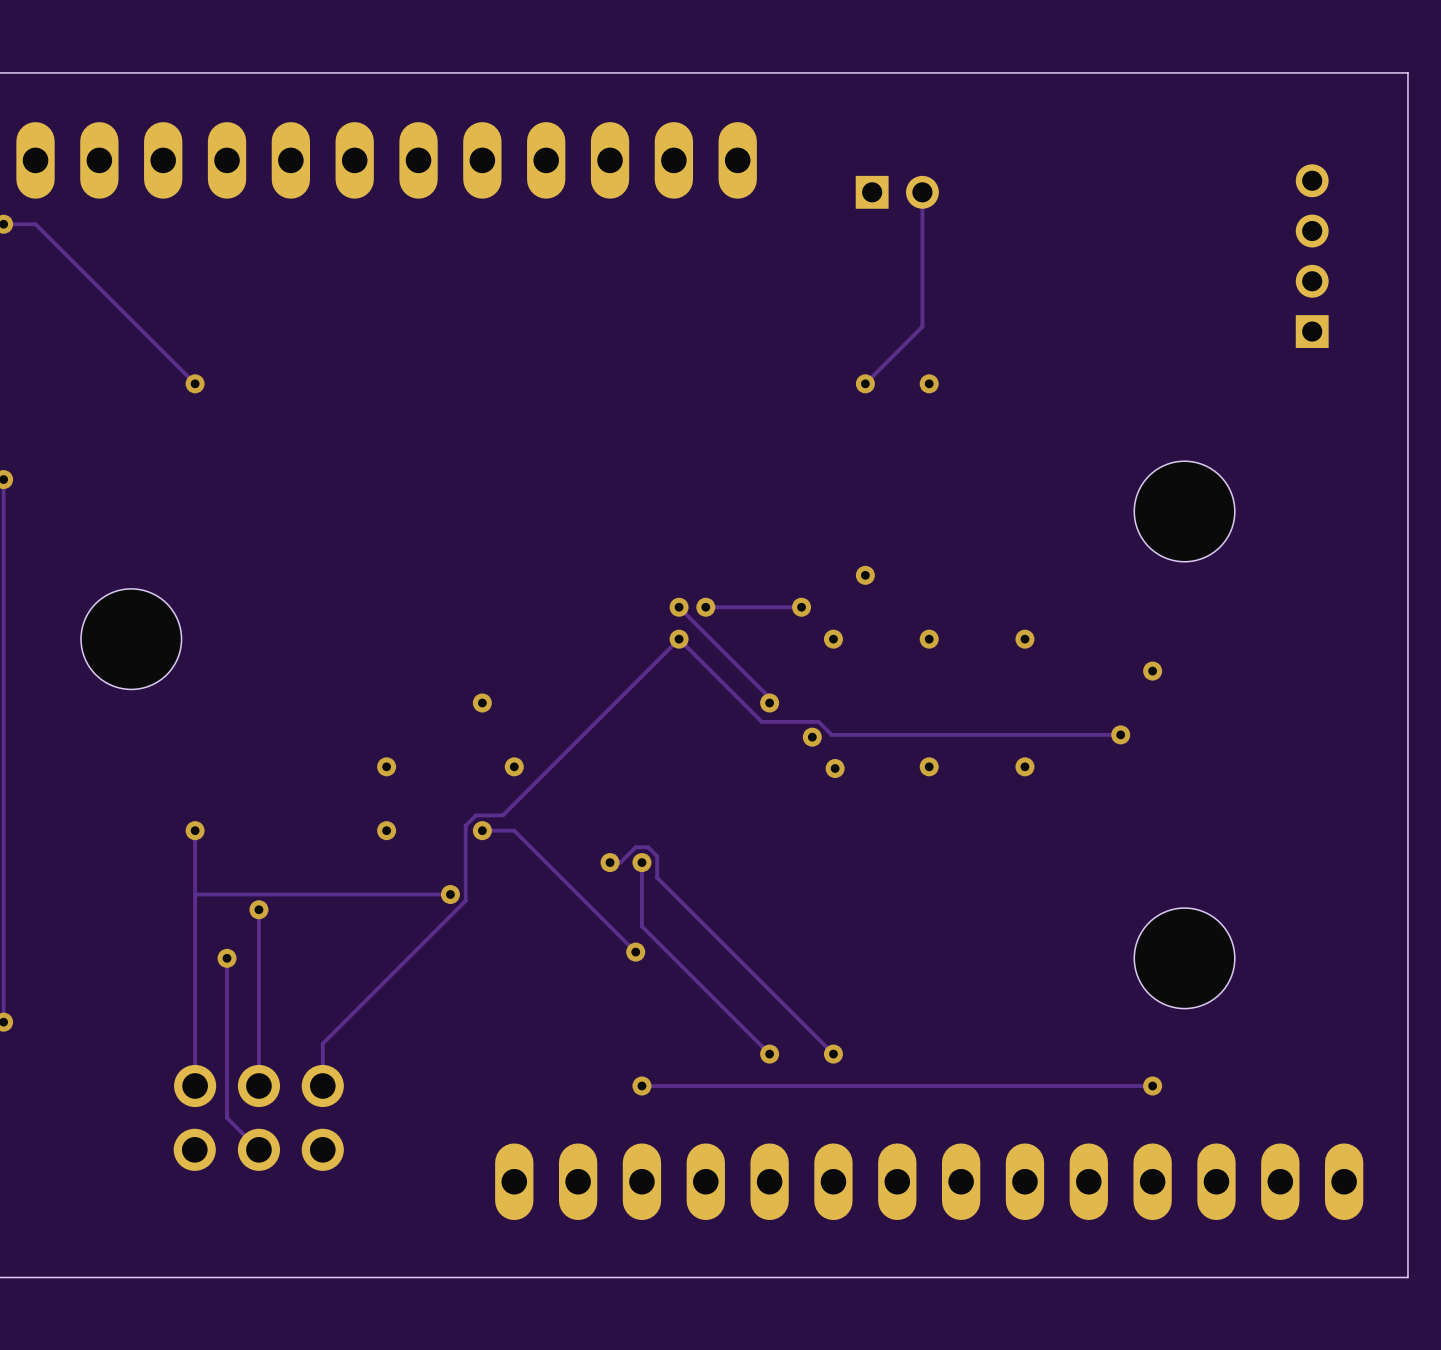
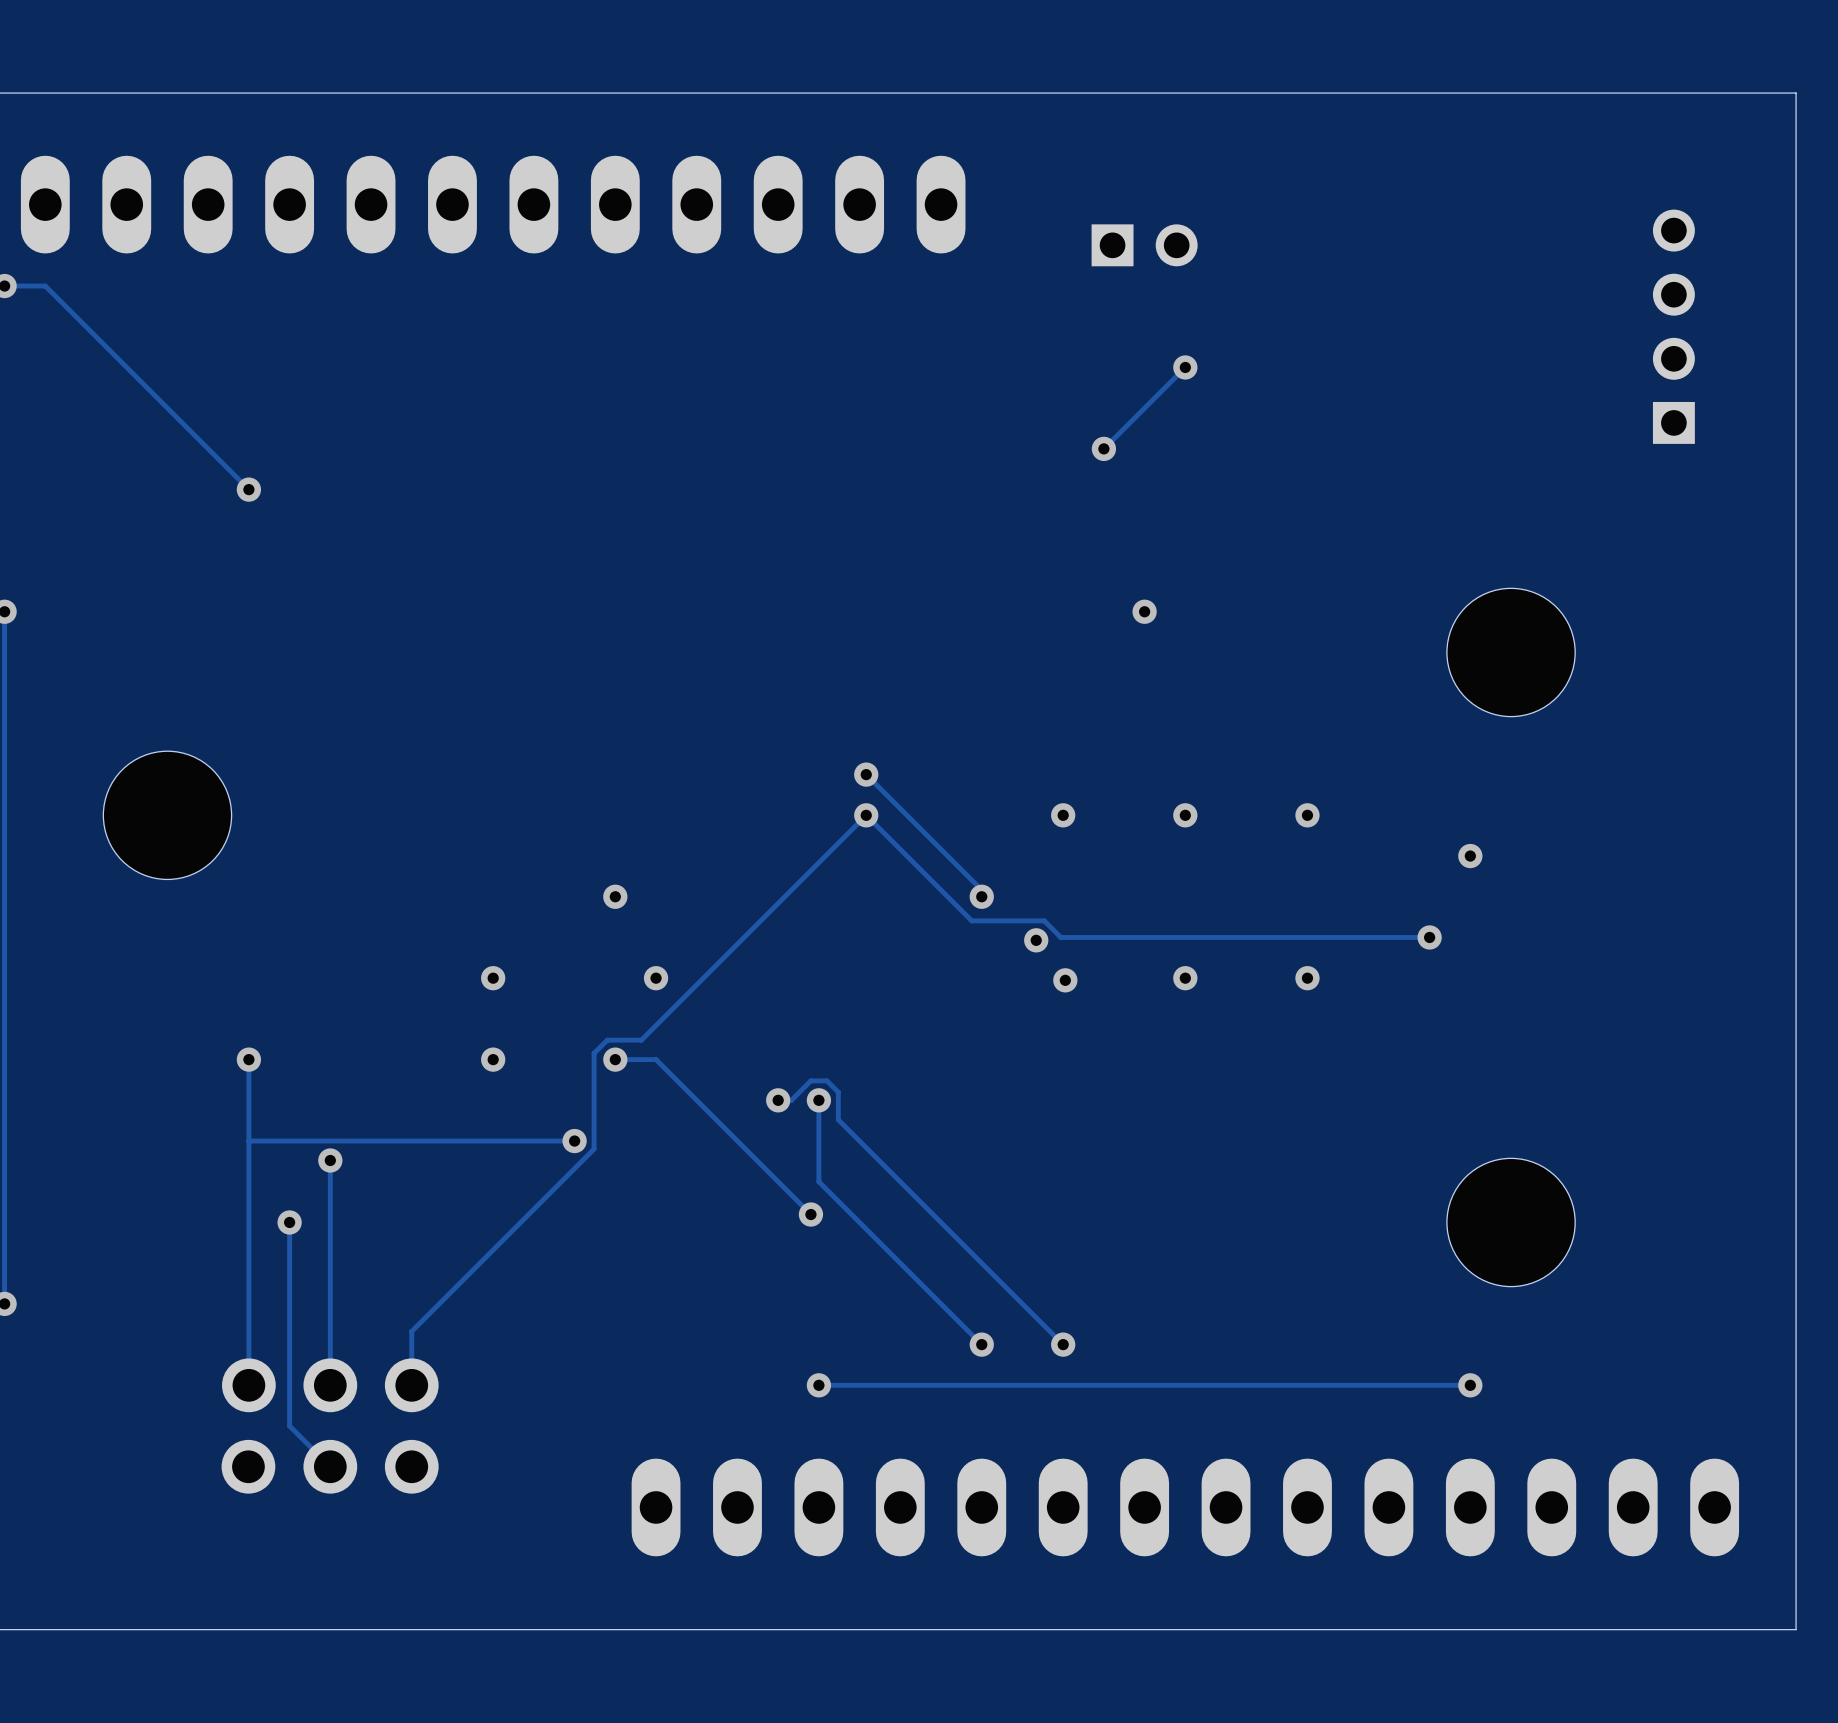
track: (922, 192) (922, 326) (865, 383) -> none
track: none -> (1185, 367) (1103, 448)
via: none -> (1185, 367)
via position: (865, 383) -> (1103, 448)
via: (929, 383) -> none
via: none -> (1144, 611)
via: (865, 575) -> none
via: (705, 607) -> none
track: (801, 607) (705, 607) -> none
via: (801, 607) -> none

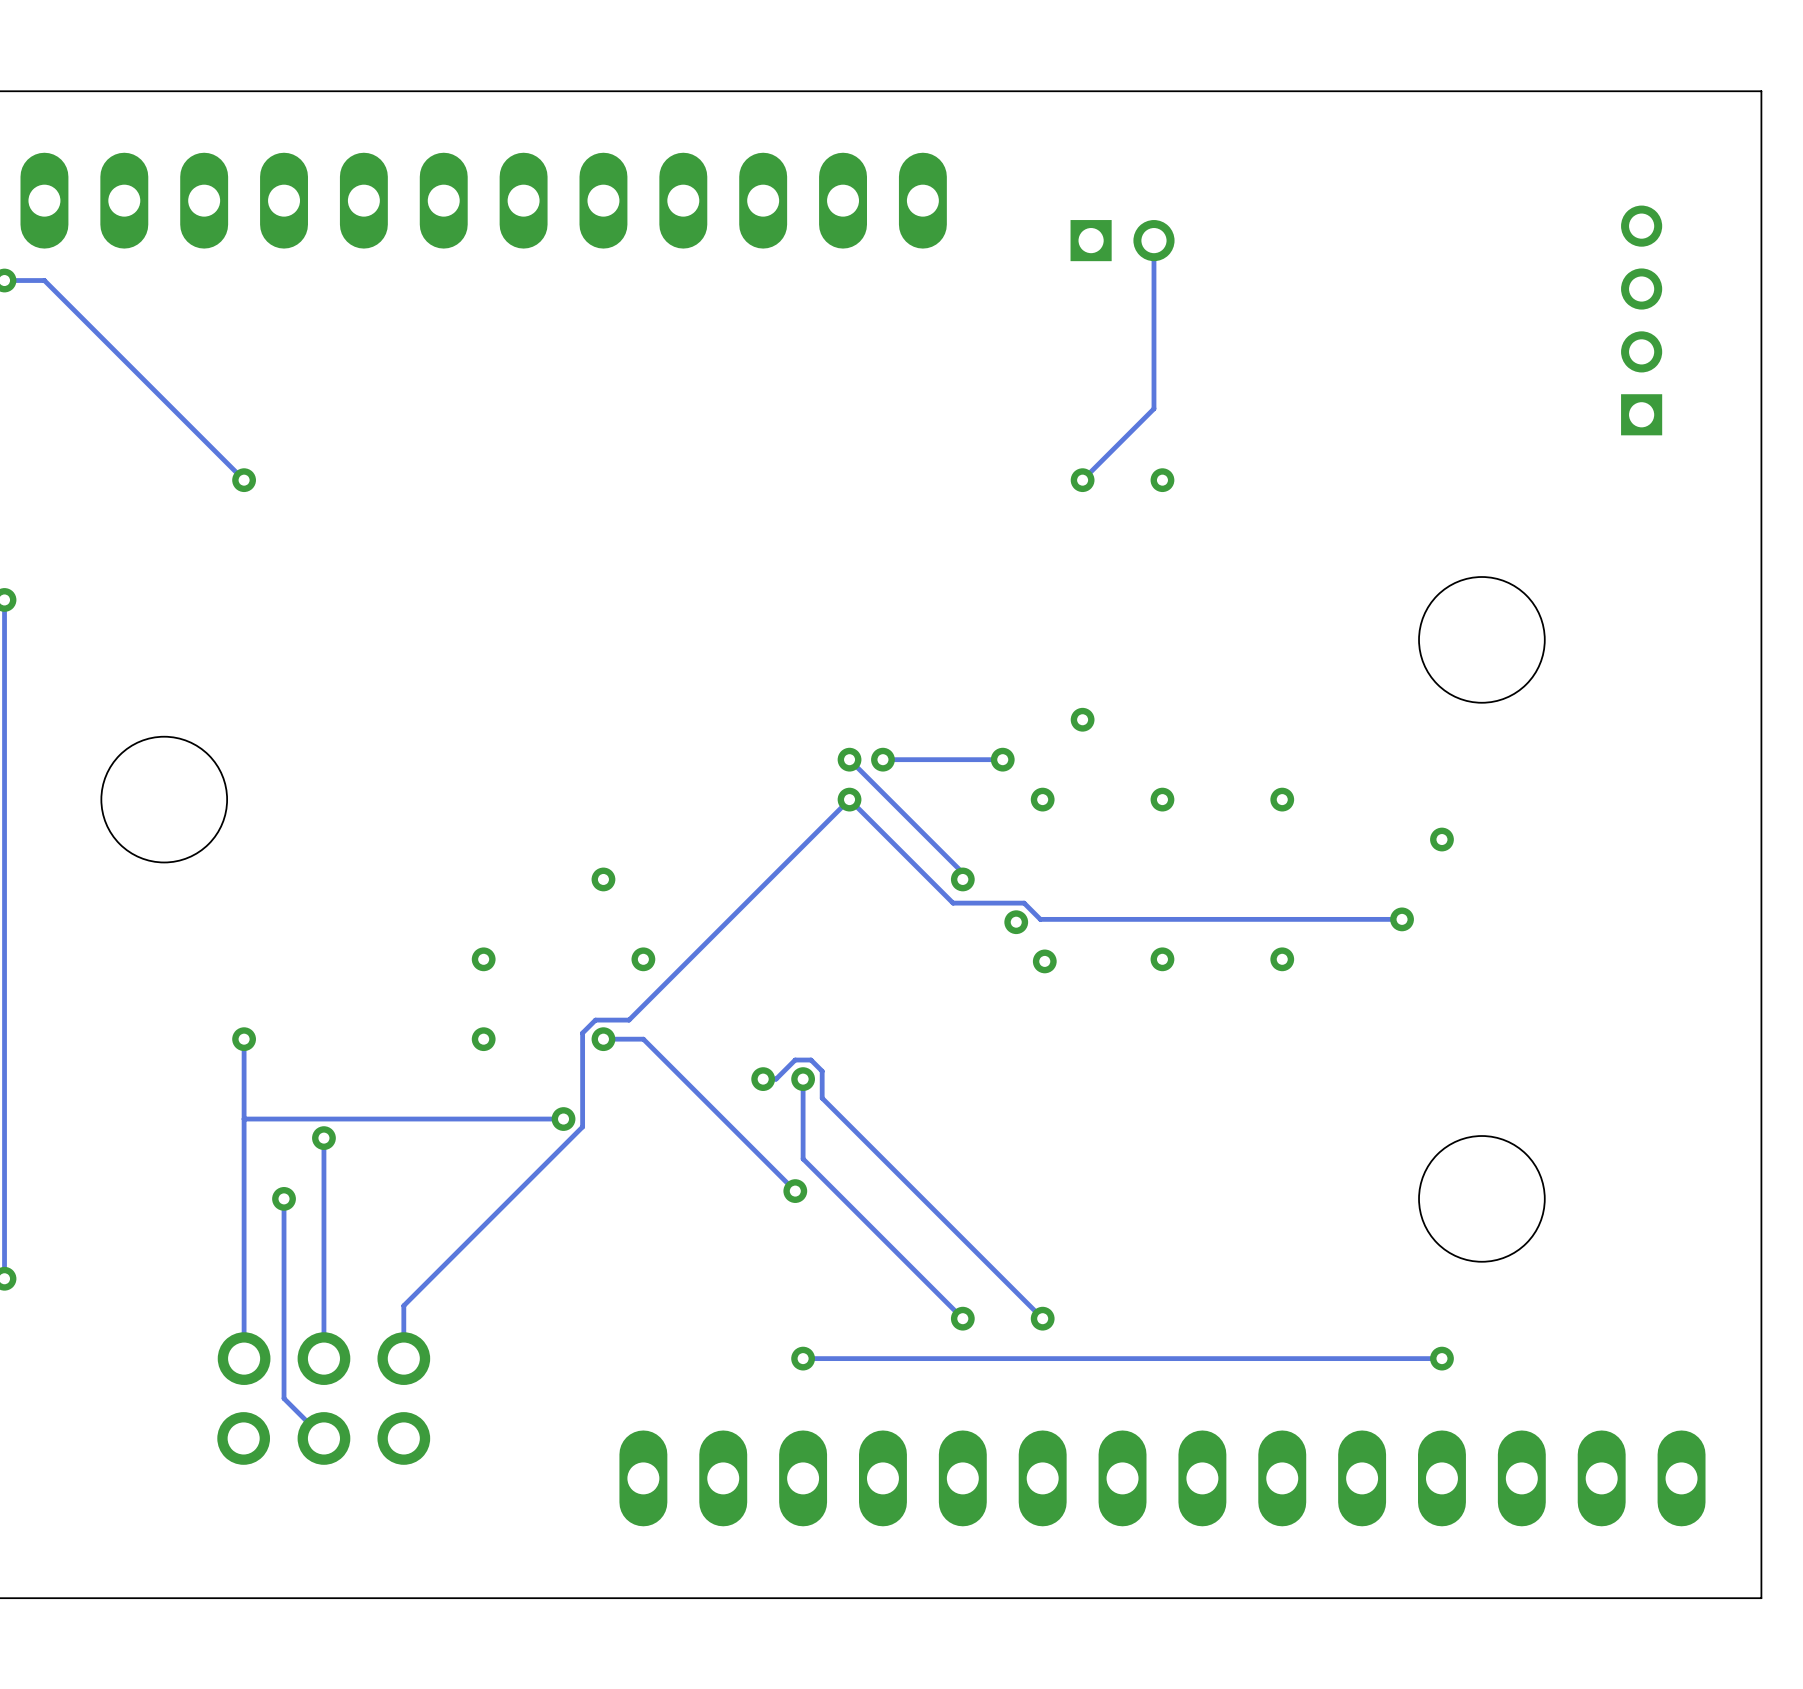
track: none -> (1153, 240) (1153, 408) (1082, 480)
track: (1185, 367) (1103, 448) -> none
via: (1185, 367) -> none
via position: (1103, 448) -> (1082, 480)
via: none -> (1162, 480)
via: (1144, 611) -> none
via: none -> (1082, 719)
via: none -> (882, 759)
track: none -> (1002, 759) (882, 759)
via: none -> (1002, 759)

